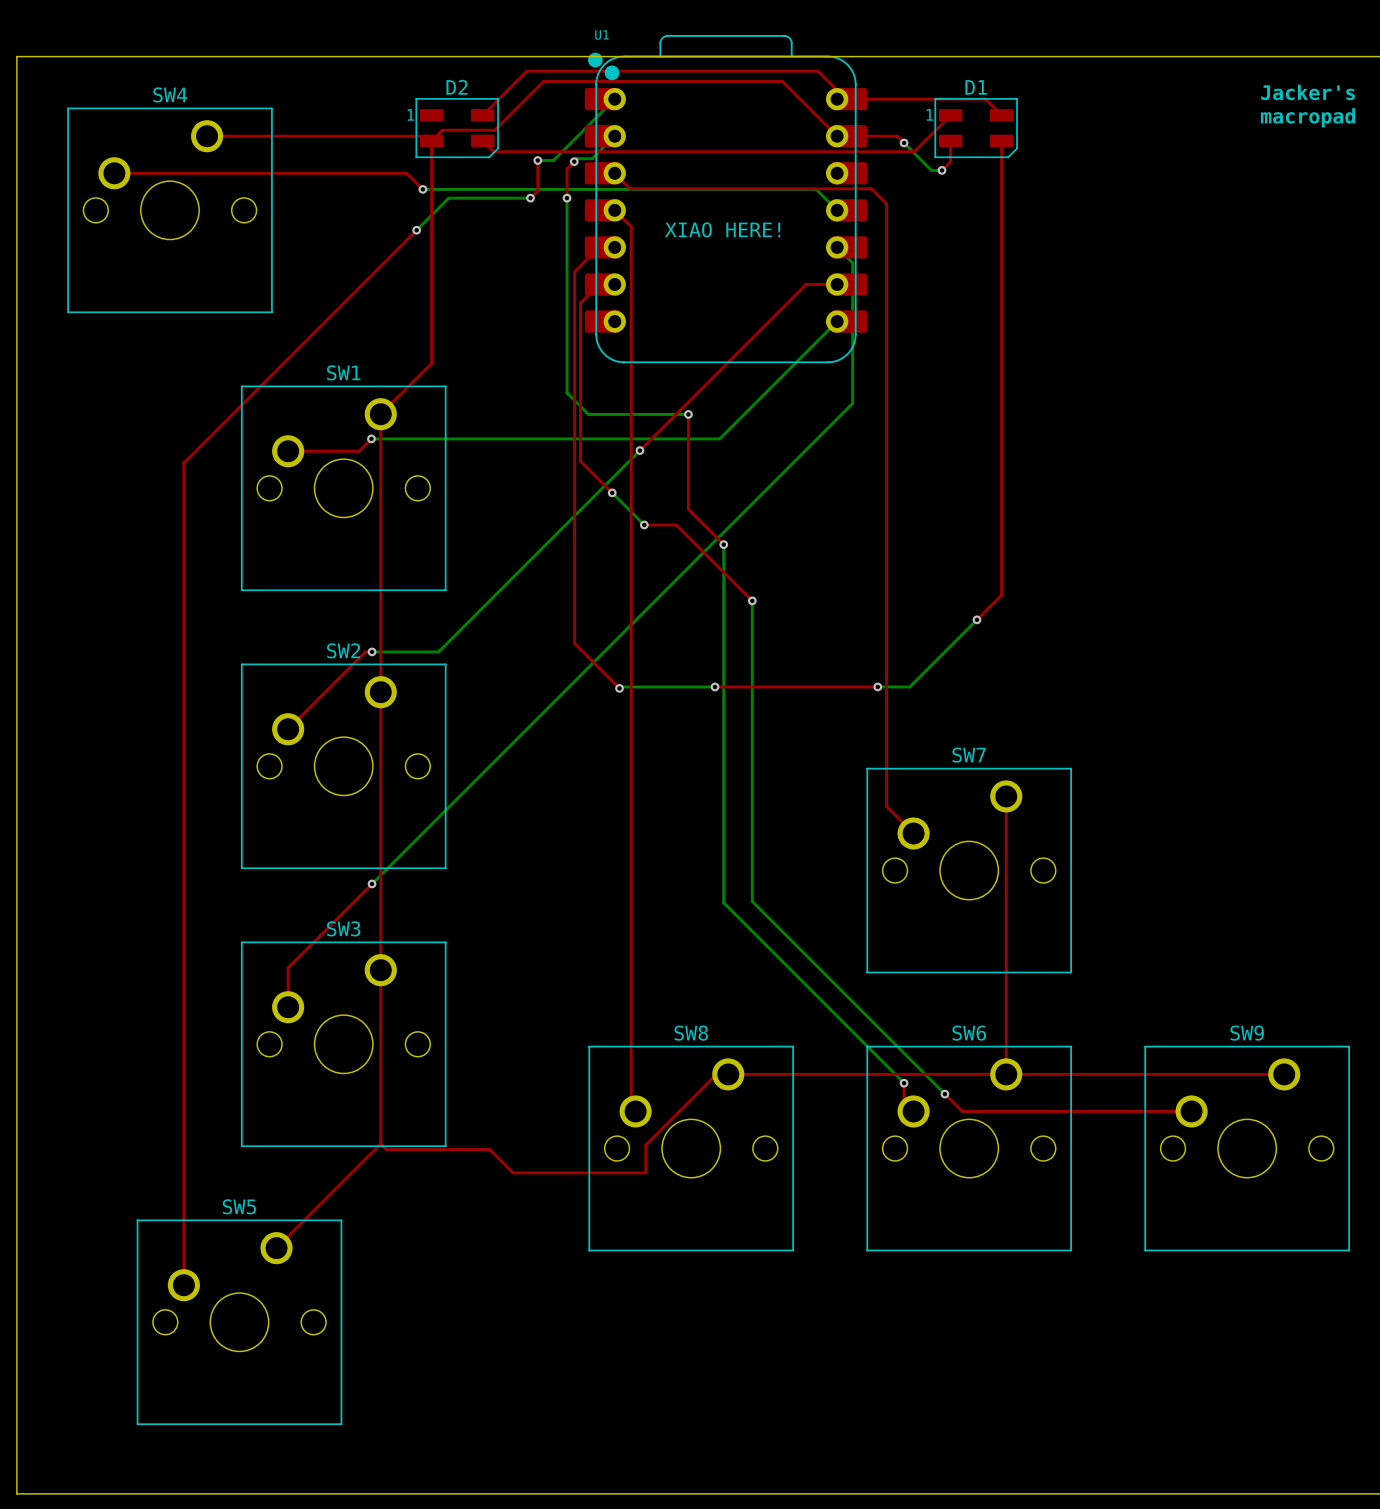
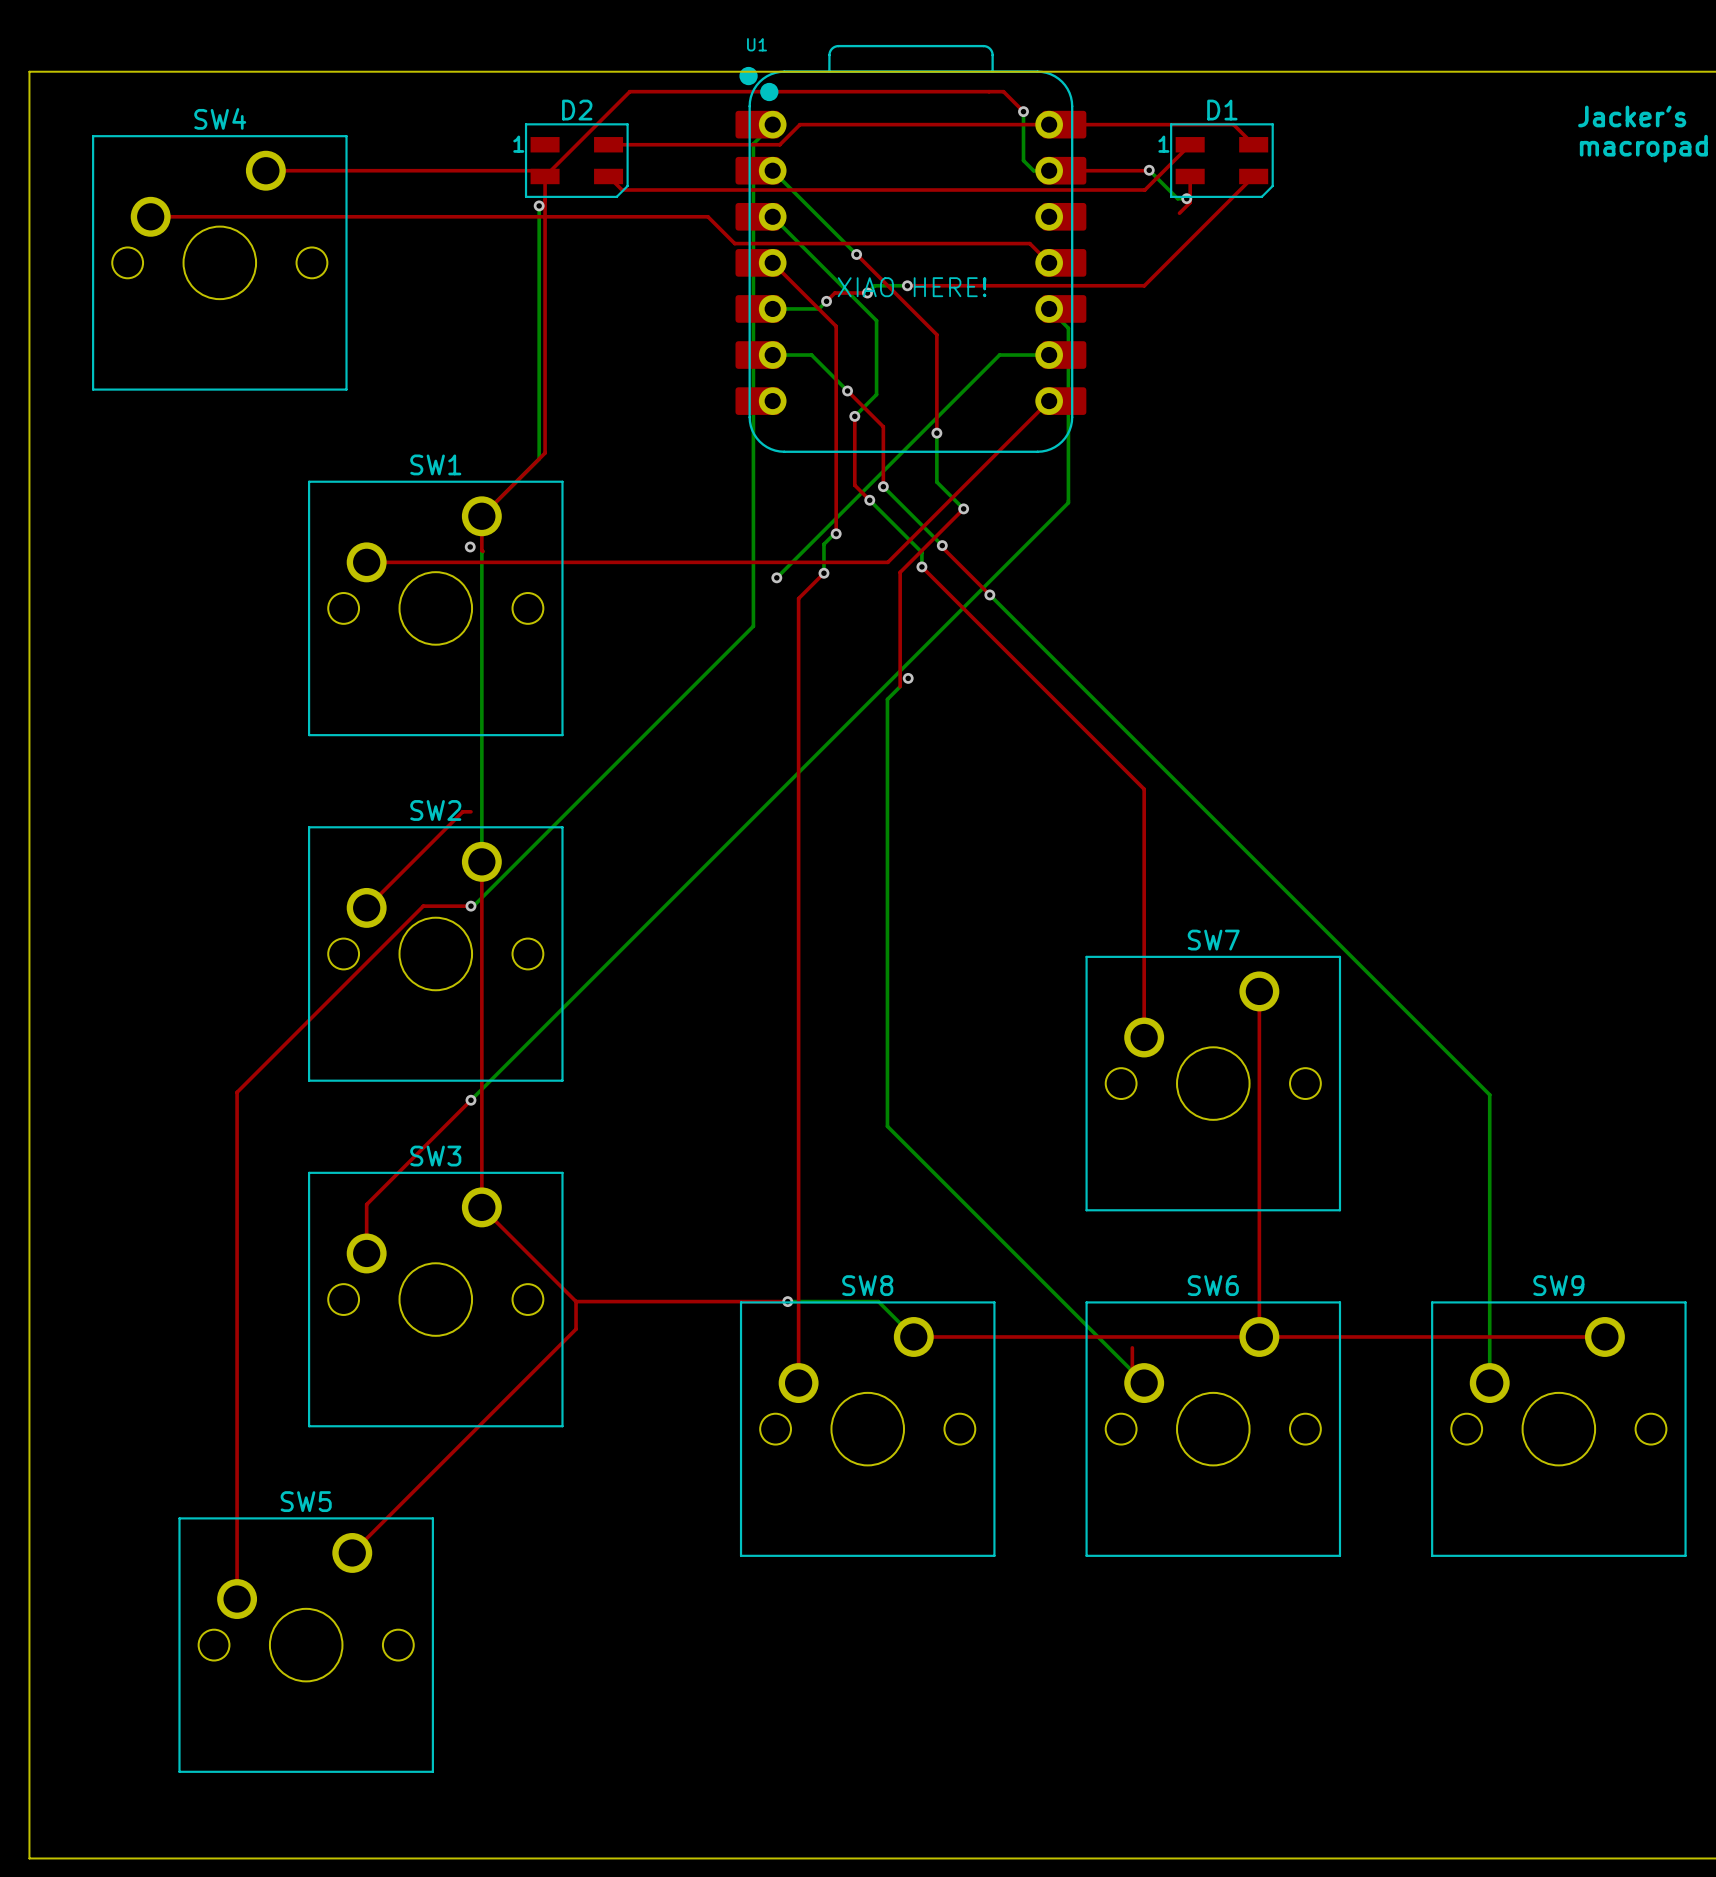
bottom track: none -> (1023, 111) (1023, 160) (1033, 170) (1049, 170)
via: none -> (1023, 111)
top track: (837, 99) (837, 90) (817, 71) (526, 71) (482, 115) -> (1049, 124) (799, 124) (779, 144) (608, 144)
bottom track: (599, 114) (553, 160) (537, 160) -> (753, 143) (753, 626) (473, 906) (470, 906)
top track: (442, 130) (494, 130) (543, 81) (782, 81) (837, 136) -> (558, 163) (629, 91) (1003, 91) (1023, 111)
bottom track: none -> (1149, 170) (1177, 198) (1186, 198)
bottom track: (614, 136) (592, 158) (577, 158) (574, 161) -> (772, 170) (854, 252)
top track: (897, 136) (904, 142) -> (1123, 170) (1149, 170)
top track: (1001, 140) (1001, 595) (977, 619) -> (1253, 176) (1144, 285) (907, 285)
bottom track: (904, 142) (931, 170) (942, 170) -> none
via position: (904, 142) -> (1149, 170)
top track: (537, 160) (537, 190) (530, 198) -> none
via: (537, 160) -> none
top track: (574, 161) (566, 168) (566, 198) -> none
via: (574, 161) -> none
bottom track: none -> (539, 205) (539, 458) (481, 516)
via position: (942, 170) -> (1186, 198)
top track: (406, 173) (422, 189) -> (514, 216) (707, 216) (734, 243) (1029, 243) (1049, 262)
top track: (614, 173) (630, 188) (871, 188) (886, 203) (886, 806) (913, 833) -> (921, 566) (1144, 789) (1144, 1037)
bottom track: none -> (772, 216) (876, 320) (876, 394) (854, 416)
bottom track: (422, 189) (816, 189) (837, 210) -> none
via position: (422, 189) -> (539, 205)
bottom track: (530, 198) (448, 198) (416, 230) -> none
via: (530, 198) -> none
bottom track: (566, 198) (566, 392) (588, 414) (688, 414) -> none
via: (566, 198) -> none
top track: none -> (856, 254) (936, 334) (936, 433)
via: none -> (856, 254)
top track: (631, 226) (631, 1107) (635, 1111) -> (823, 573) (798, 598) (798, 1383)
top track: none -> (793, 283) (836, 326) (836, 533)
bottom track: none -> (907, 285) (874, 285) (867, 293)
via: none -> (907, 285)
top track: (416, 230) (183, 463) (183, 877) -> (470, 906) (423, 906) (237, 1092)
via: (416, 230) -> none
top track: none -> (867, 293) (834, 293) (826, 301)
via: none -> (867, 293)
bottom track: none -> (826, 301) (818, 308) (772, 308)
via: none -> (826, 301)
top track: (614, 247) (599, 247) (574, 271) (574, 643) (619, 688) -> none
top track: (614, 284) (599, 284) (580, 303) (580, 461) (612, 492) -> none
bottom track: none -> (772, 355) (811, 355) (847, 390)
top track: (837, 284) (806, 284) (639, 450) -> none
bottom track: none -> (1049, 355) (999, 355) (776, 577)
top track: none -> (847, 390) (883, 426) (883, 486)
via: none -> (847, 390)
bottom track: (837, 321) (719, 438) (371, 438) -> none
top track: none -> (854, 416) (854, 485) (869, 500)
via: none -> (854, 416)
bottom track: none -> (936, 433) (936, 482) (963, 508)
via: none -> (936, 433)
bottom track: none -> (881, 484) (942, 545)
via: none -> (883, 486)
bottom track: none -> (869, 500) (921, 552) (921, 566)
via: none -> (869, 500)
top track: none -> (963, 508) (900, 572) (900, 686)
via: none -> (963, 508)
top track: (688, 414) (688, 509) (723, 544) -> none
via: (688, 414) -> none
bottom track: none -> (836, 533) (823, 544) (823, 573)
via: none -> (836, 533)
top track: none -> (942, 545) (989, 594)
via: none -> (942, 545)
top track: (371, 438) (359, 451) -> (1049, 401) (887, 562) (454, 562)
top track: (380, 441) (380, 692) -> (481, 550) (482, 551)
bottom track: none -> (482, 551) (481, 861)
bottom track: (639, 450) (438, 651) (372, 651) -> none
via: (639, 450) -> none
via: none -> (921, 566)
via: none -> (823, 573)
via: none -> (776, 577)
bottom track: none -> (989, 594) (1489, 1094) (1489, 1383)
via: none -> (989, 594)
bottom track: (612, 492) (644, 524) -> none
via: (612, 492) -> none
top track: (644, 524) (676, 524) (752, 600) -> none
via: (644, 524) -> none
bottom track: (723, 544) (723, 902) (904, 1083) -> none
bottom track: none -> (900, 686) (887, 699) (887, 1126) (1144, 1383)
bottom track: (752, 600) (752, 901) (944, 1094) -> none
via: (752, 600) -> none
bottom track: (977, 619) (909, 686) (877, 686) -> none
via: (977, 619) -> none
via position: (372, 651) -> (470, 906)
top track: (715, 686) (880, 686) -> none
bottom track: (715, 686) (619, 688) -> none
via: (715, 686) -> none
via: (877, 686) -> none
via: (619, 688) -> none
top track: (380, 970) (380, 1143) (386, 1149) (489, 1149) (513, 1172) (645, 1172) (645, 1145) (716, 1074) (728, 1074) -> (481, 1207) (576, 1301)
top track: none -> (576, 1301) (787, 1301)
top track: none -> (576, 1301) (576, 1329) (481, 1423)
bottom track: none -> (787, 1301) (878, 1301) (913, 1336)
via: none -> (787, 1301)
via: (904, 1083) -> none
top track: (944, 1094) (962, 1111) (1191, 1111) -> none
via: (944, 1094) -> none

